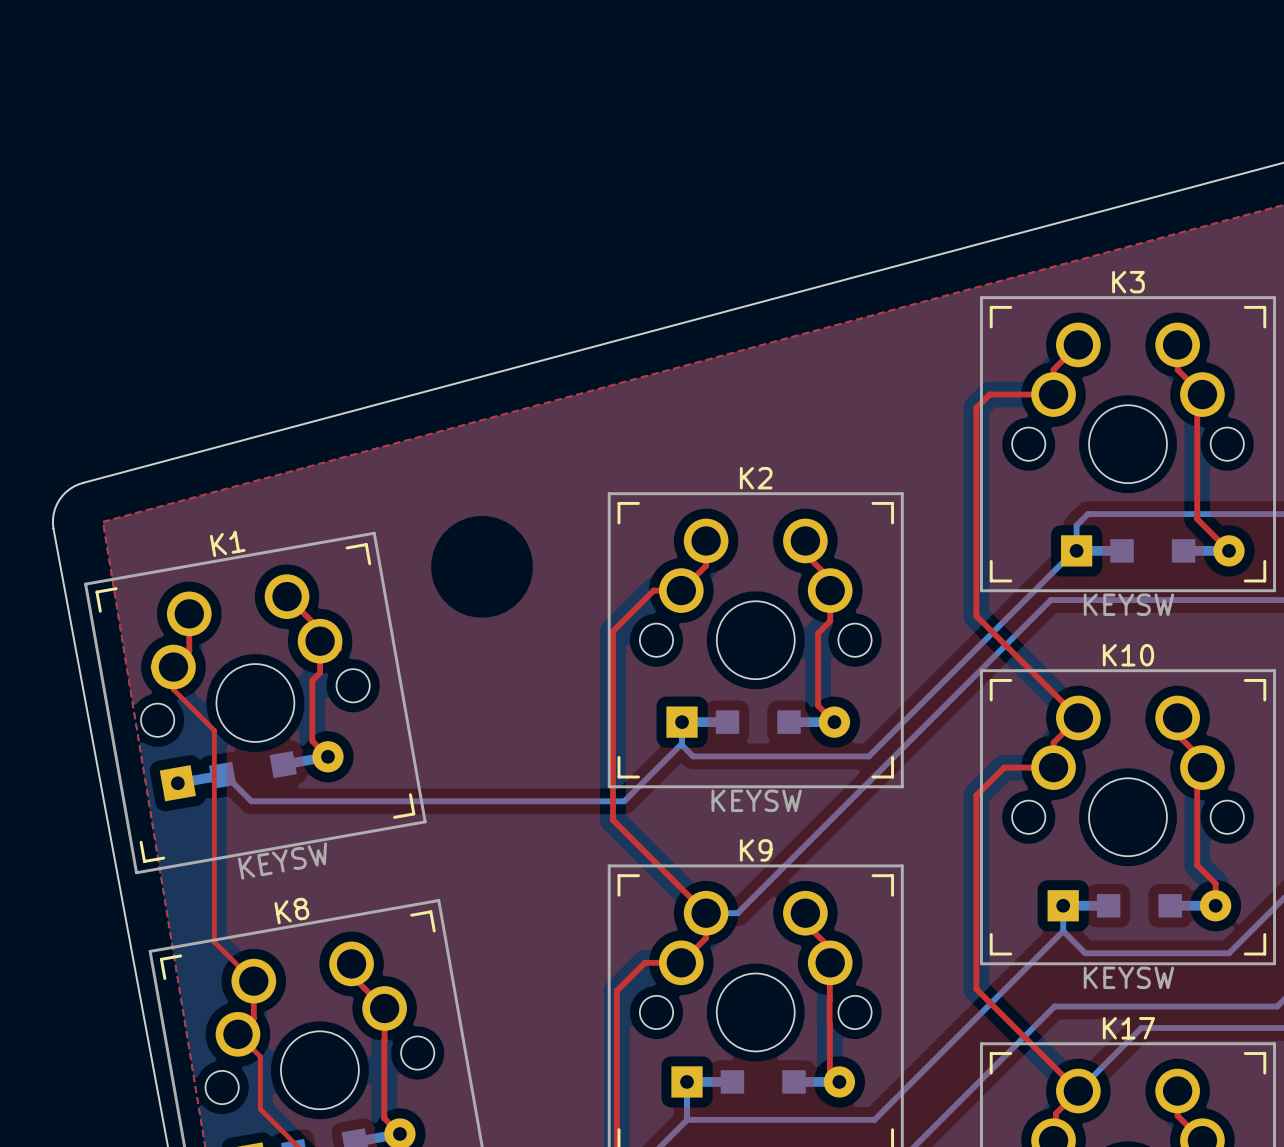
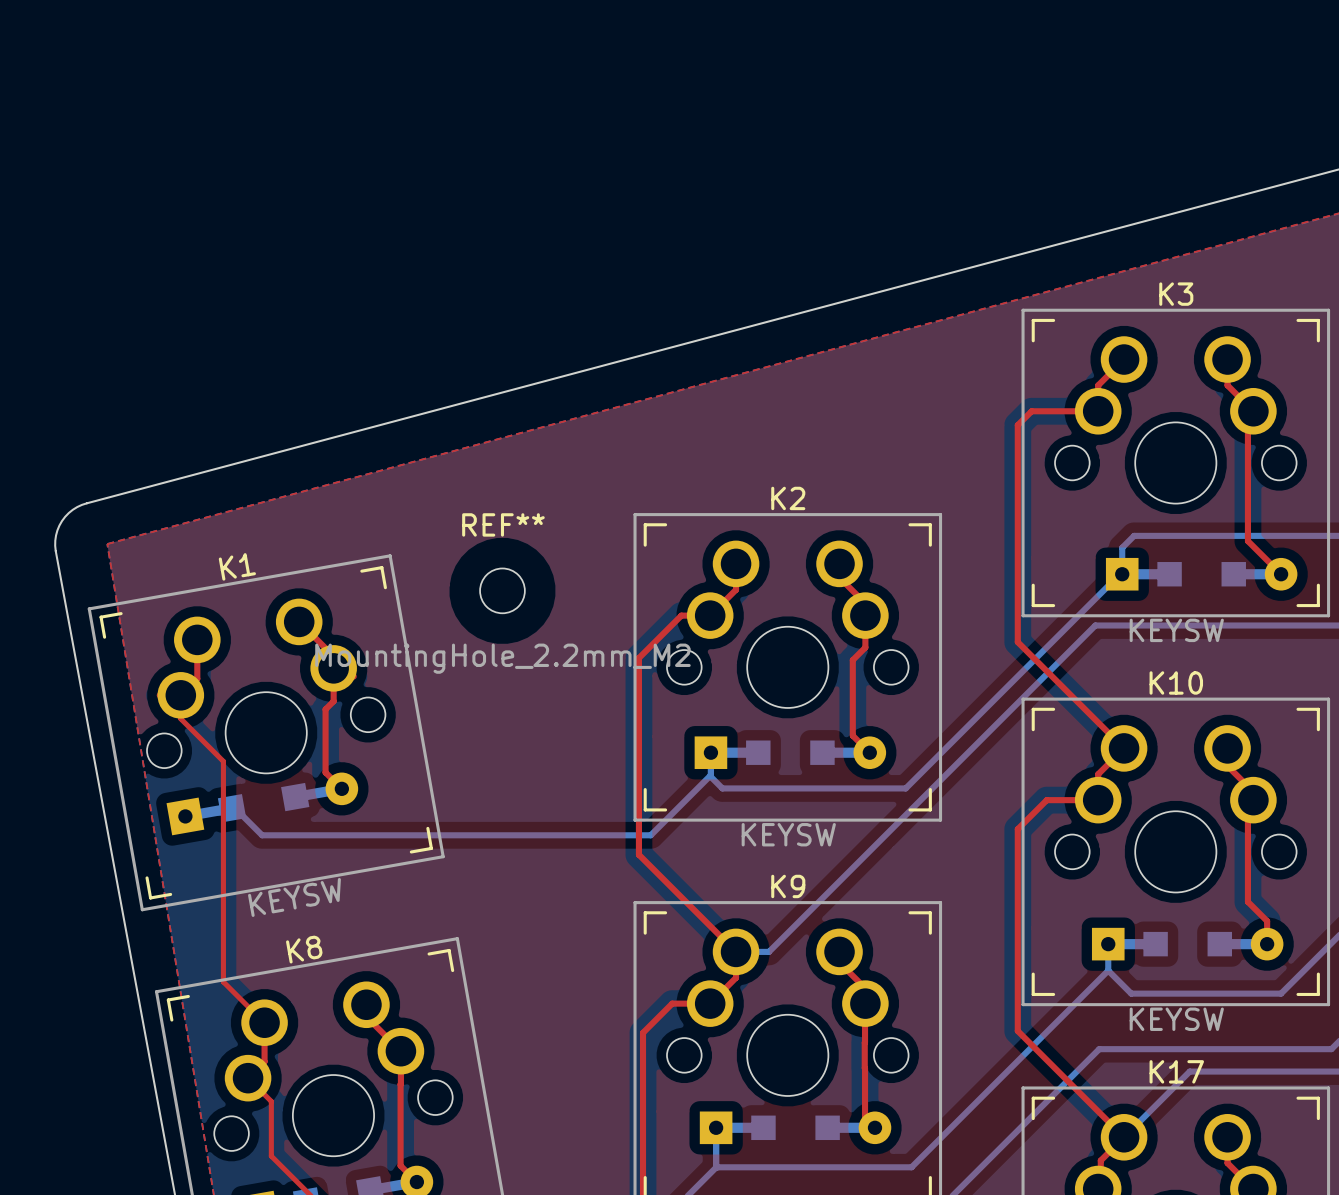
REF**: none -> MountingHole_2.2mm_M2 (502, 590)

